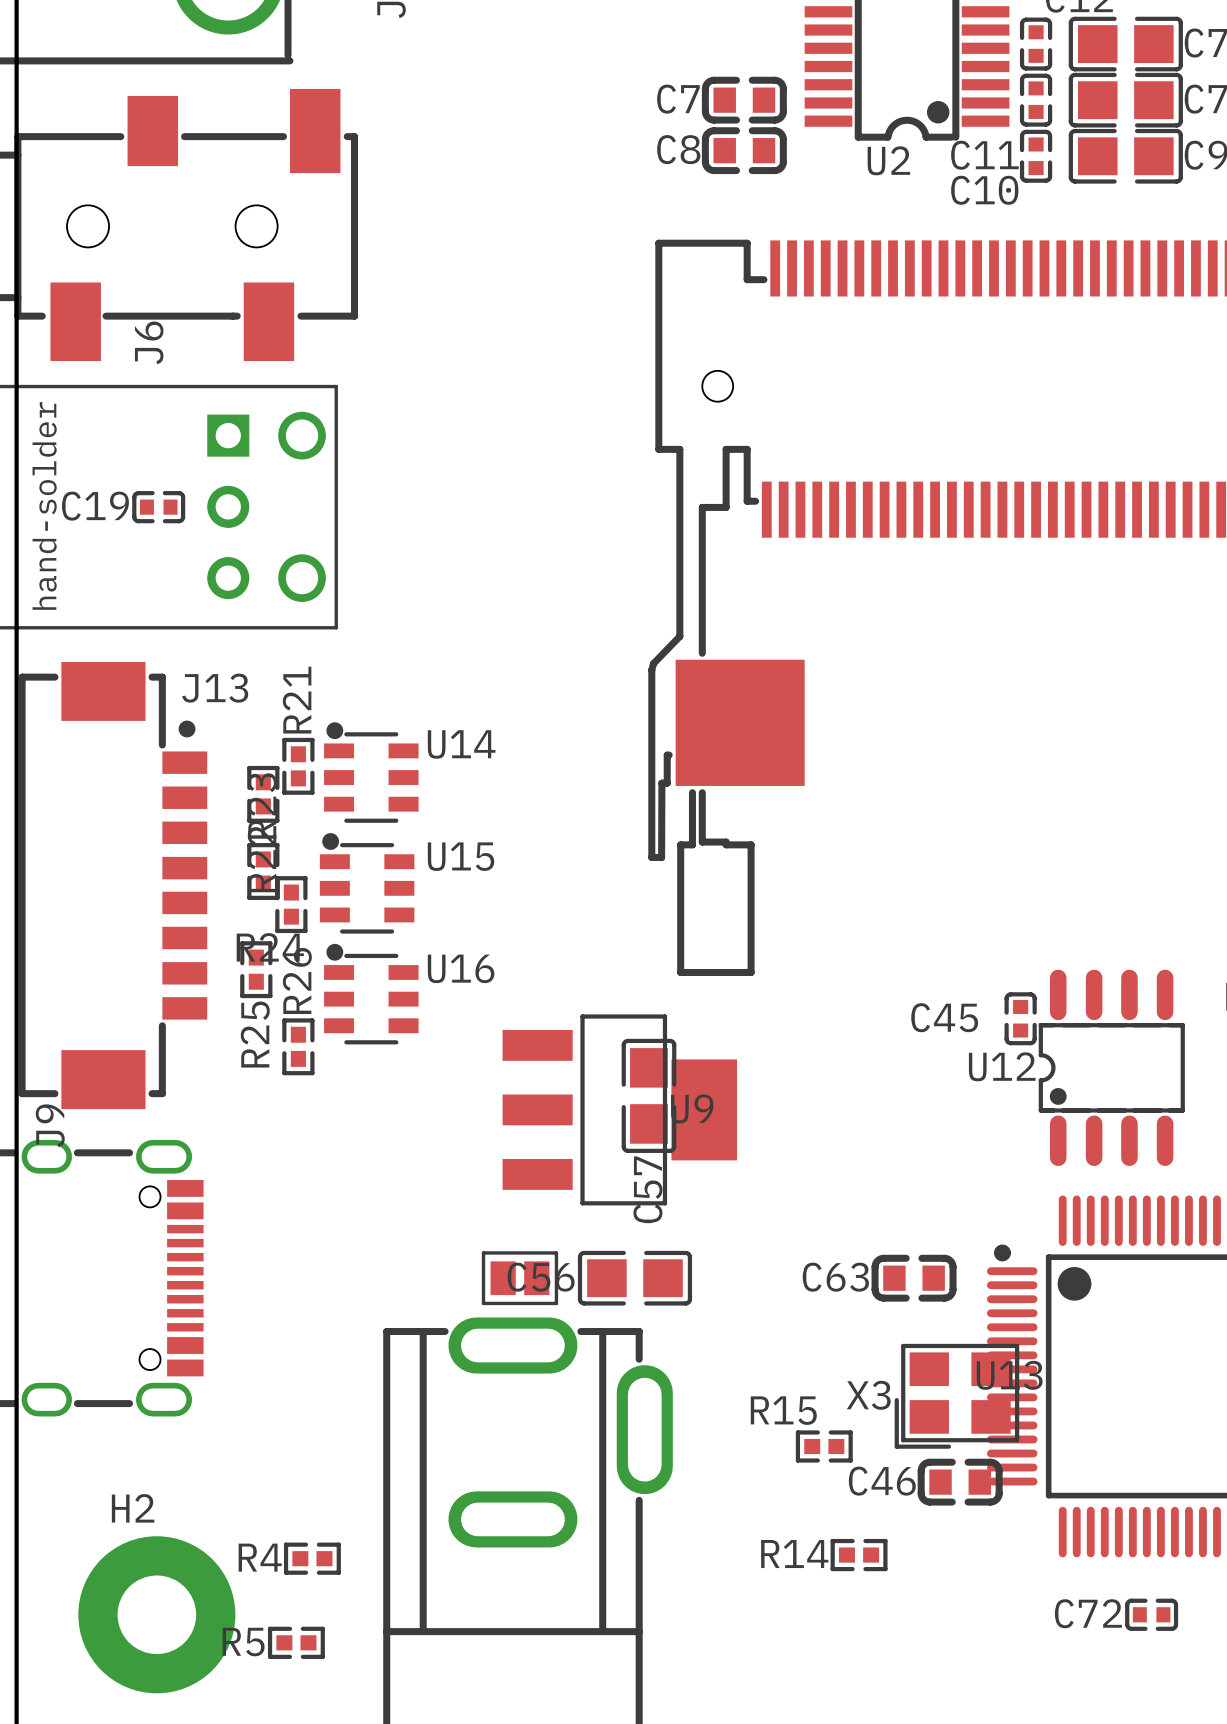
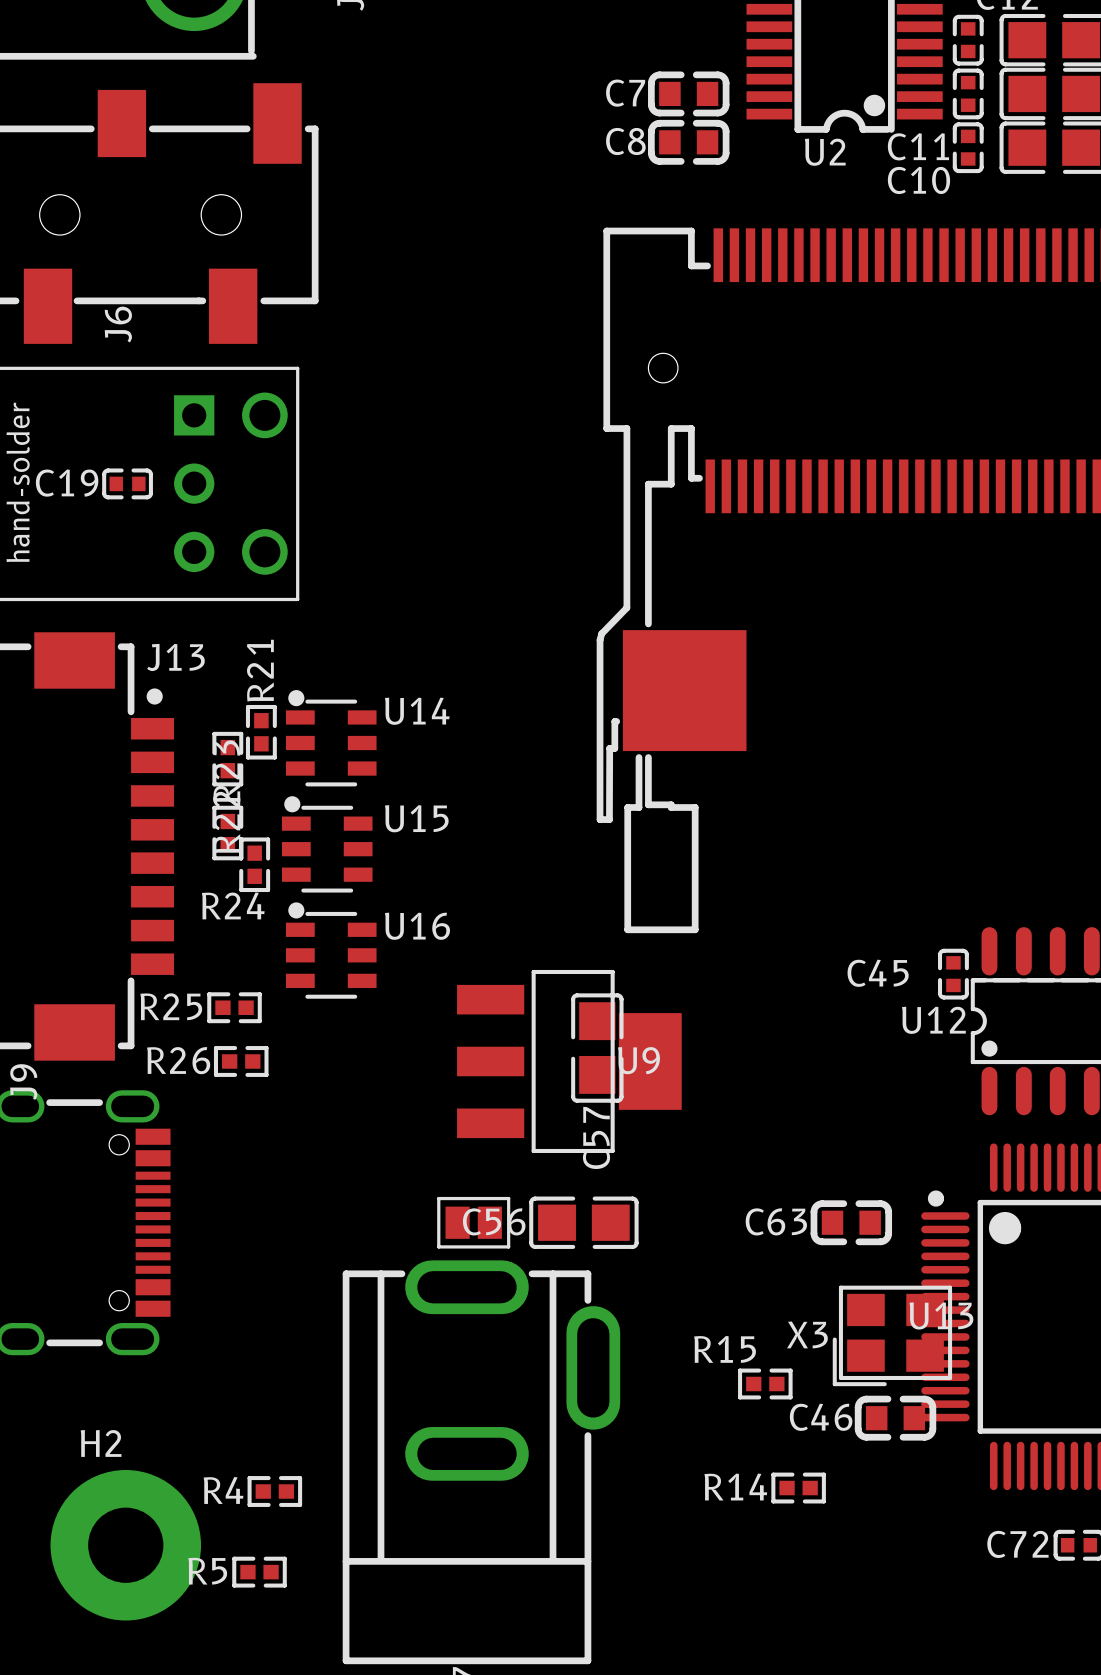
R25 rotation: 0° (256, 969) -> 90° clockwise (234, 1007)
R25 position: (256, 969) -> (234, 1007)
R26 name position: R26 (297, 980) -> R26 (178, 1060)
R26 rotation: 0° (298, 1046) -> 90° clockwise (241, 1061)
R26 position: (298, 1046) -> (241, 1061)

